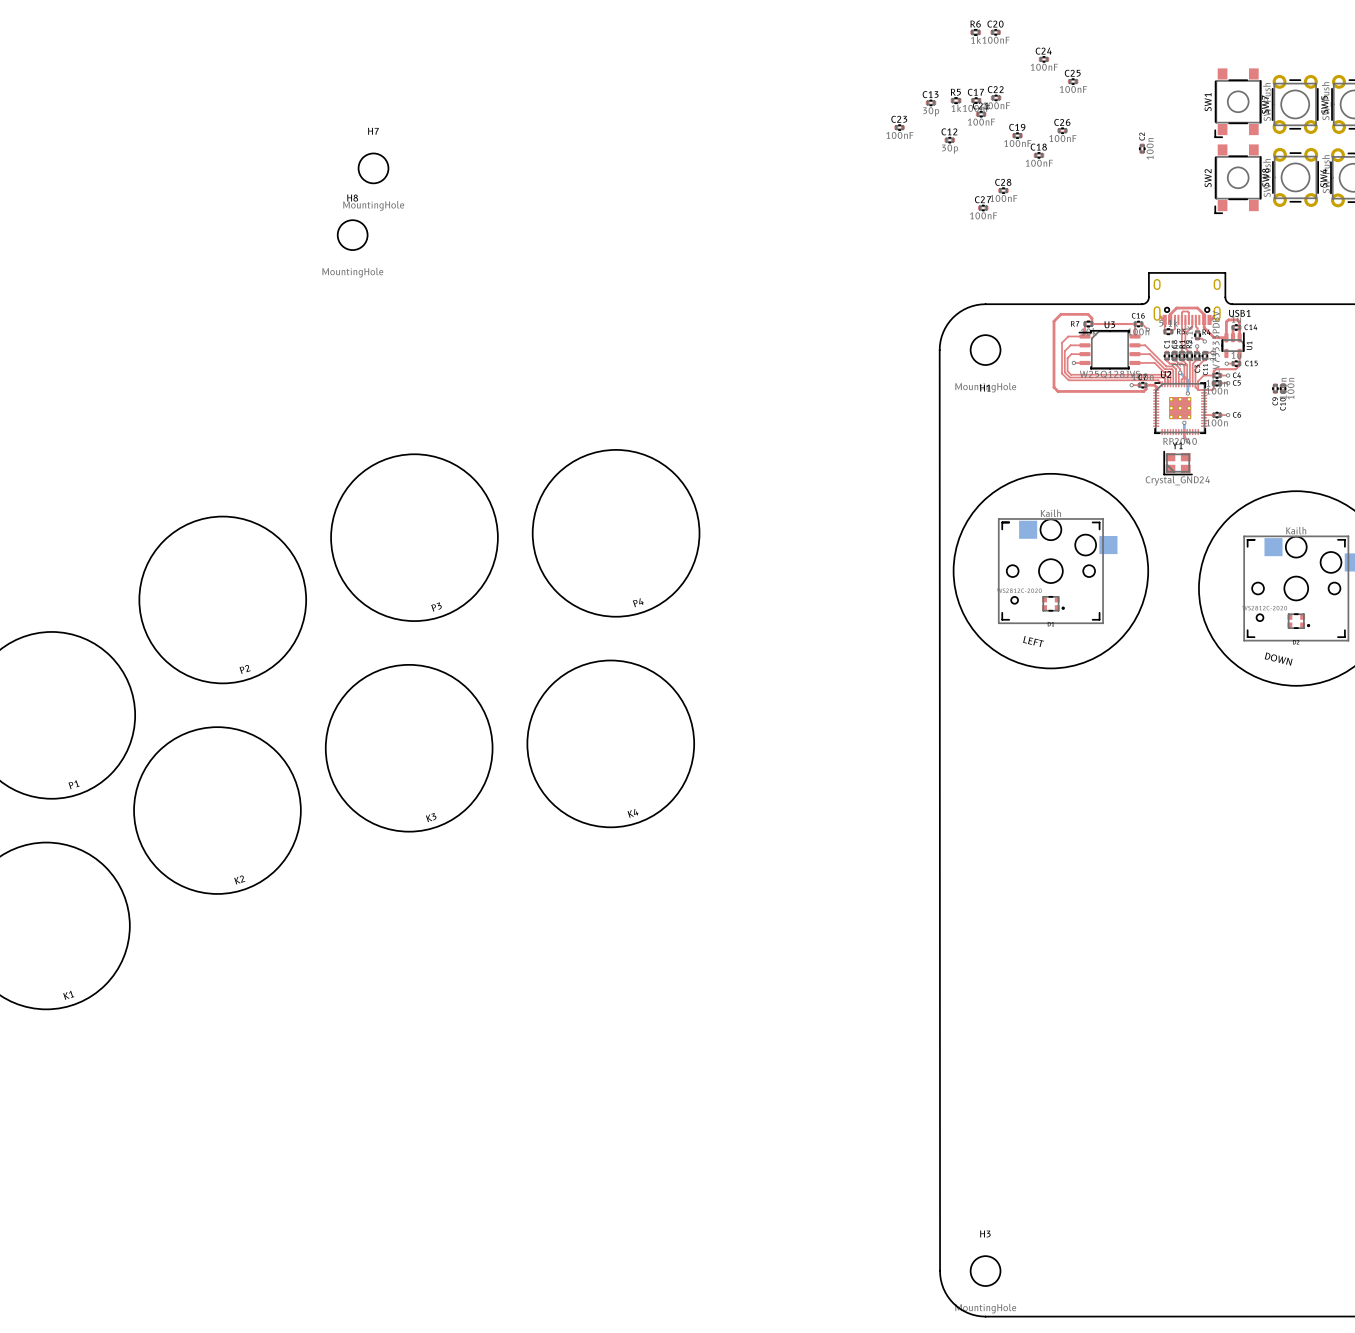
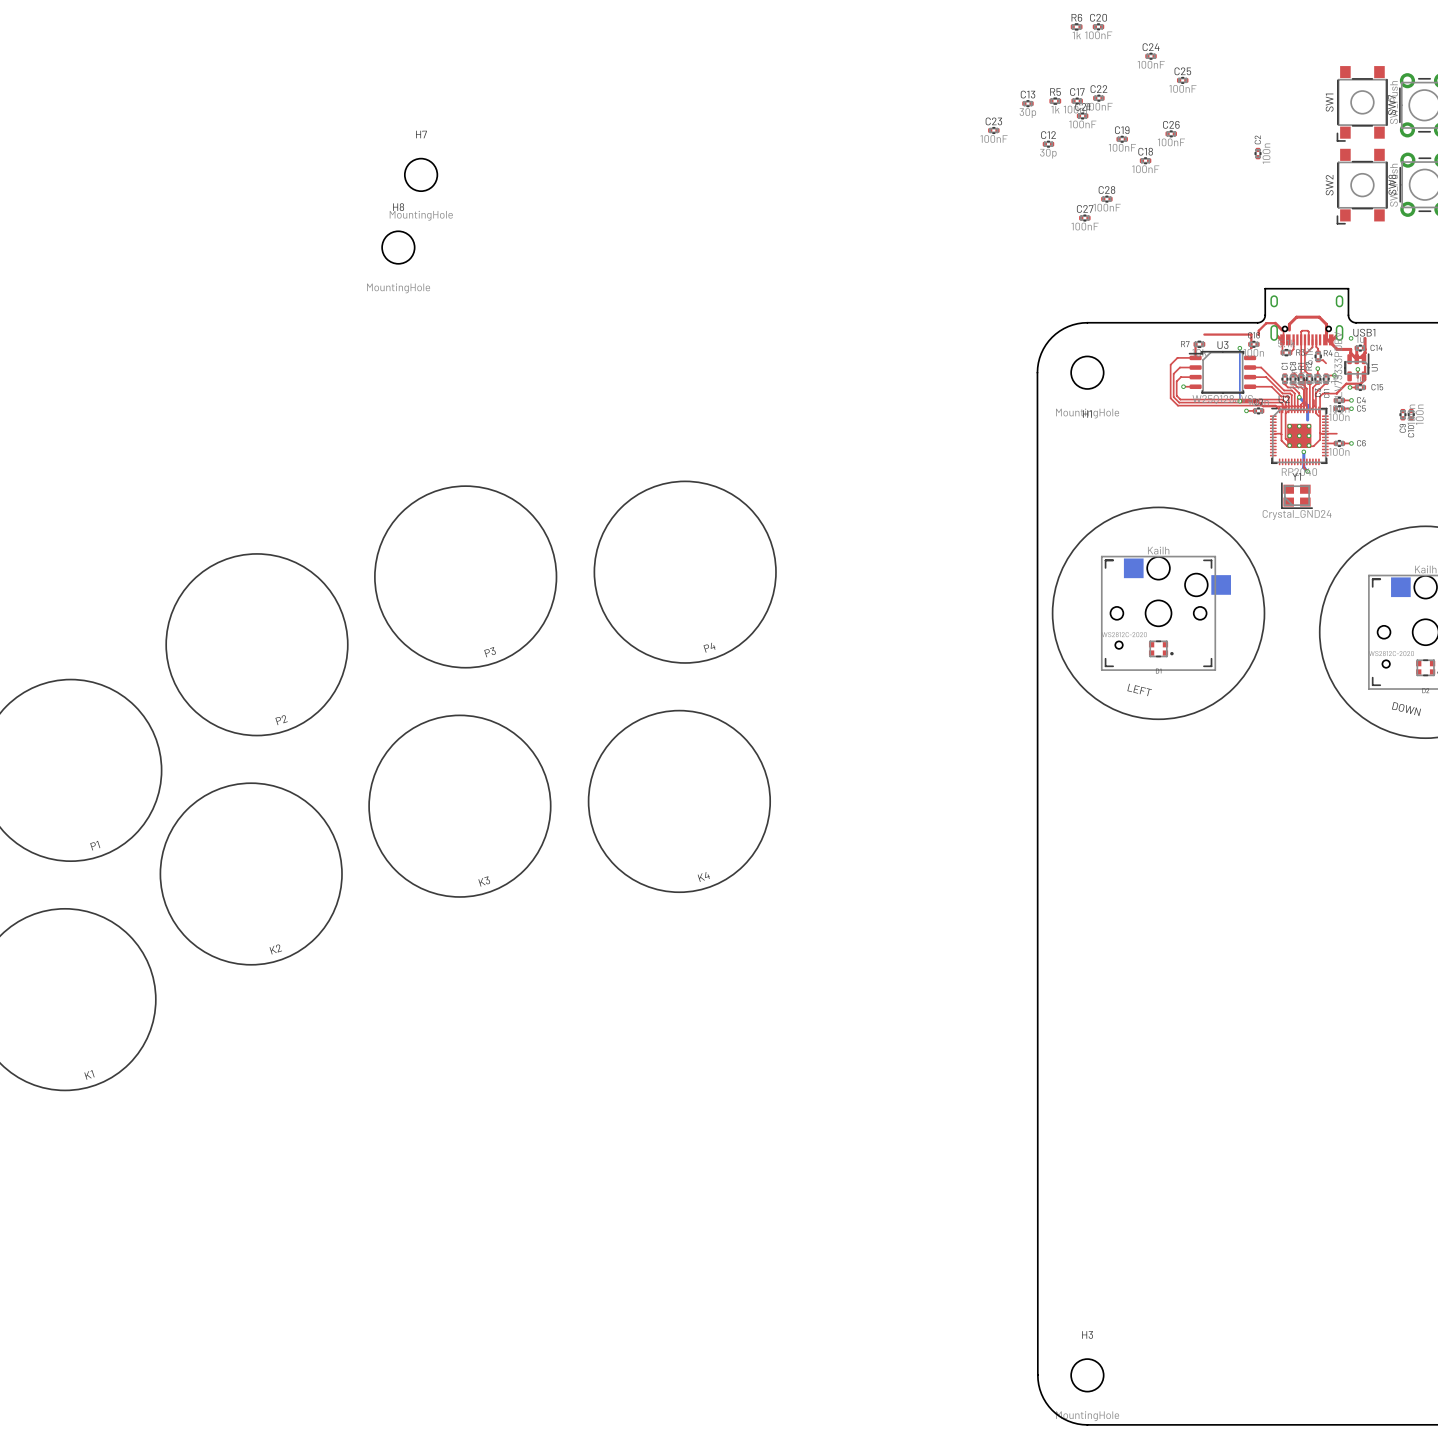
top track: none -> (1289, 330) (1289, 324) (1296, 317) (1319, 317) (1326, 324) (1326, 338) (1337, 349) (1350, 349) (1350, 353) (1355, 357) (1360, 357) (1365, 353) (1365, 338)
top track: none -> (1204, 334) (1251, 334) (1251, 348)
top track: none -> (1258, 334) (1258, 330) (1266, 323) (1275, 323) (1283, 330) (1283, 342)
via: none -> (1351, 338)
top track: (1170, 319) (1170, 314) (1176, 308) (1197, 308) (1204, 314) (1204, 327) (1214, 337) (1226, 337) -> none
top track: (1141, 324) (1147, 329) -> none
bottom track: none -> (1239, 348) (1239, 401)
via position: (1147, 329) -> (1239, 348)
top track: (1135, 336) (1135, 324) (1091, 324) (1091, 318) (1088, 314) (1060, 314) (1054, 321) (1054, 387) (1058, 391) (1143, 391) (1146, 385) (1154, 385) (1156, 389) -> none
via: (1204, 341) -> none
top track: (1226, 341) (1226, 321) (1228, 319) (1237, 319) (1239, 322) (1239, 341) -> none
top track: none -> (1365, 366) (1365, 379) (1360, 383) (1346, 383) (1336, 393) (1323, 393) (1320, 396) (1320, 439) (1313, 446) (1287, 446) (1281, 440) (1281, 411) (1286, 406)
top track: none -> (1357, 369) (1357, 377)
via: none -> (1357, 369)
top track: none -> (1294, 373) (1304, 380) (1304, 406) (1263, 406) (1257, 401) (1239, 401)
top track: (1239, 353) (1239, 365) (1235, 369) (1216, 369) (1213, 375) (1203, 375) (1198, 381) (1198, 390) (1212, 390) (1213, 383) -> none
top track: none -> (1314, 400) (1314, 406) (1310, 410) (1288, 410) (1285, 413) (1285, 438) (1288, 442) (1304, 442)
via: none -> (1239, 401)
via: (1187, 393) -> none
top track: none -> (1320, 432) (1336, 433)
top track: none -> (1274, 433) (1281, 434)

